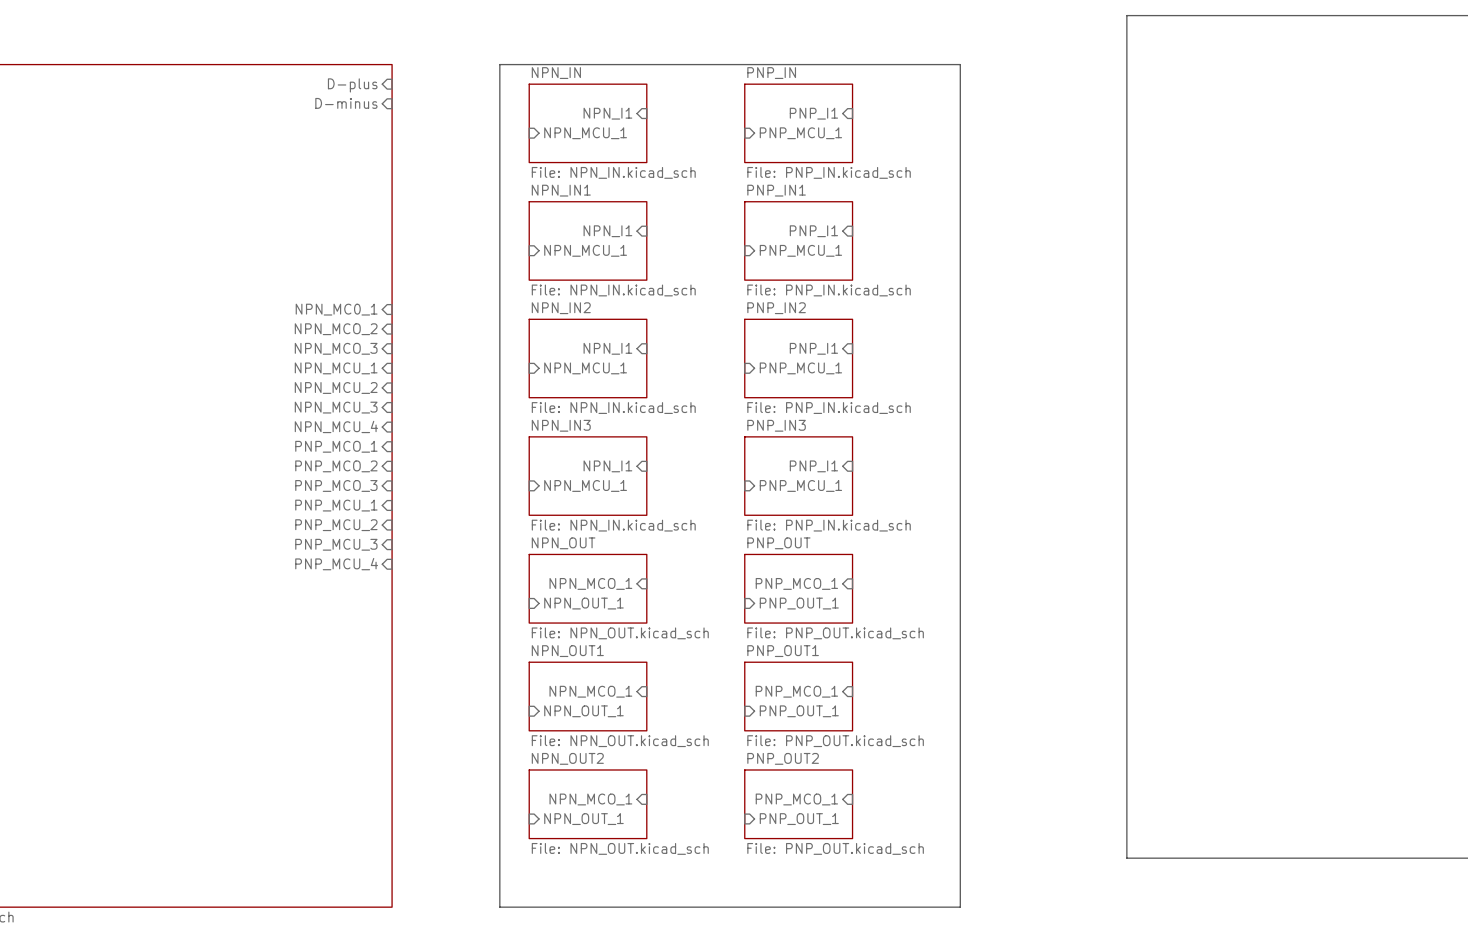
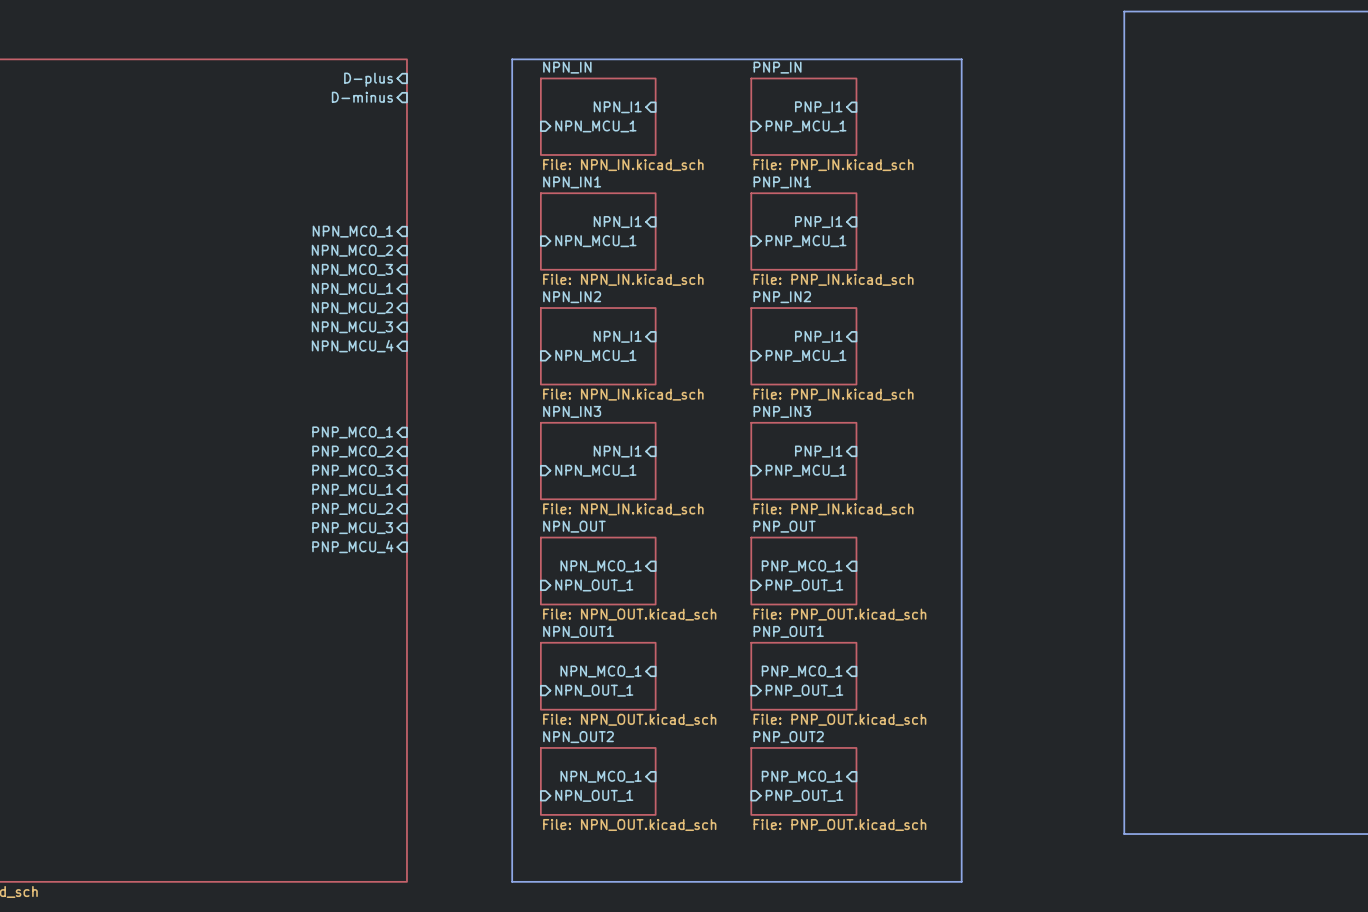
sheet pin position: NPN_MC0_1 (336, 309) -> NPN_MC0_1 (352, 231)
sheet pin position: NPN_MCO_2 (336, 329) -> NPN_MCO_2 (352, 250)
sheet pin position: NPN_MCO_3 (336, 348) -> NPN_MCO_3 (352, 269)
sheet pin position: NPN_MCU_1 (336, 368) -> NPN_MCU_1 (352, 288)
sheet pin position: NPN_MCU_2 (336, 387) -> NPN_MCU_2 (352, 308)
sheet pin position: NPN_MCU_3 (336, 407) -> NPN_MCU_3 (352, 327)
sheet pin position: NPN_MCU_4 (336, 426) -> NPN_MCU_4 (352, 346)

